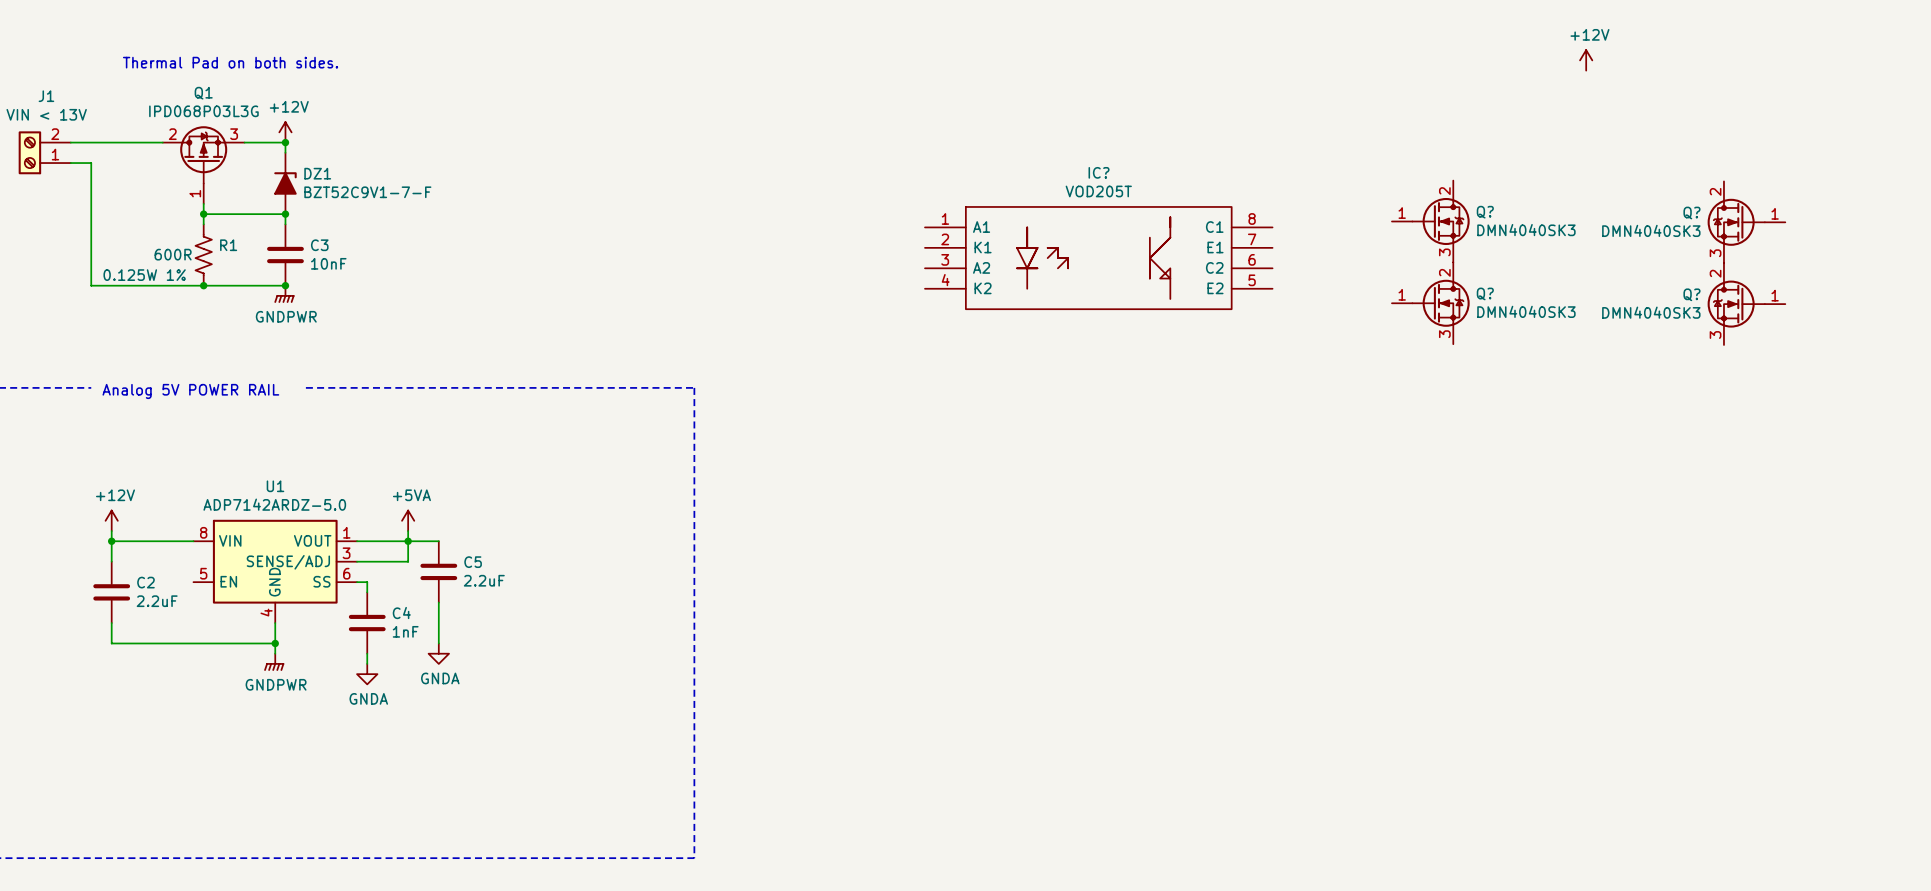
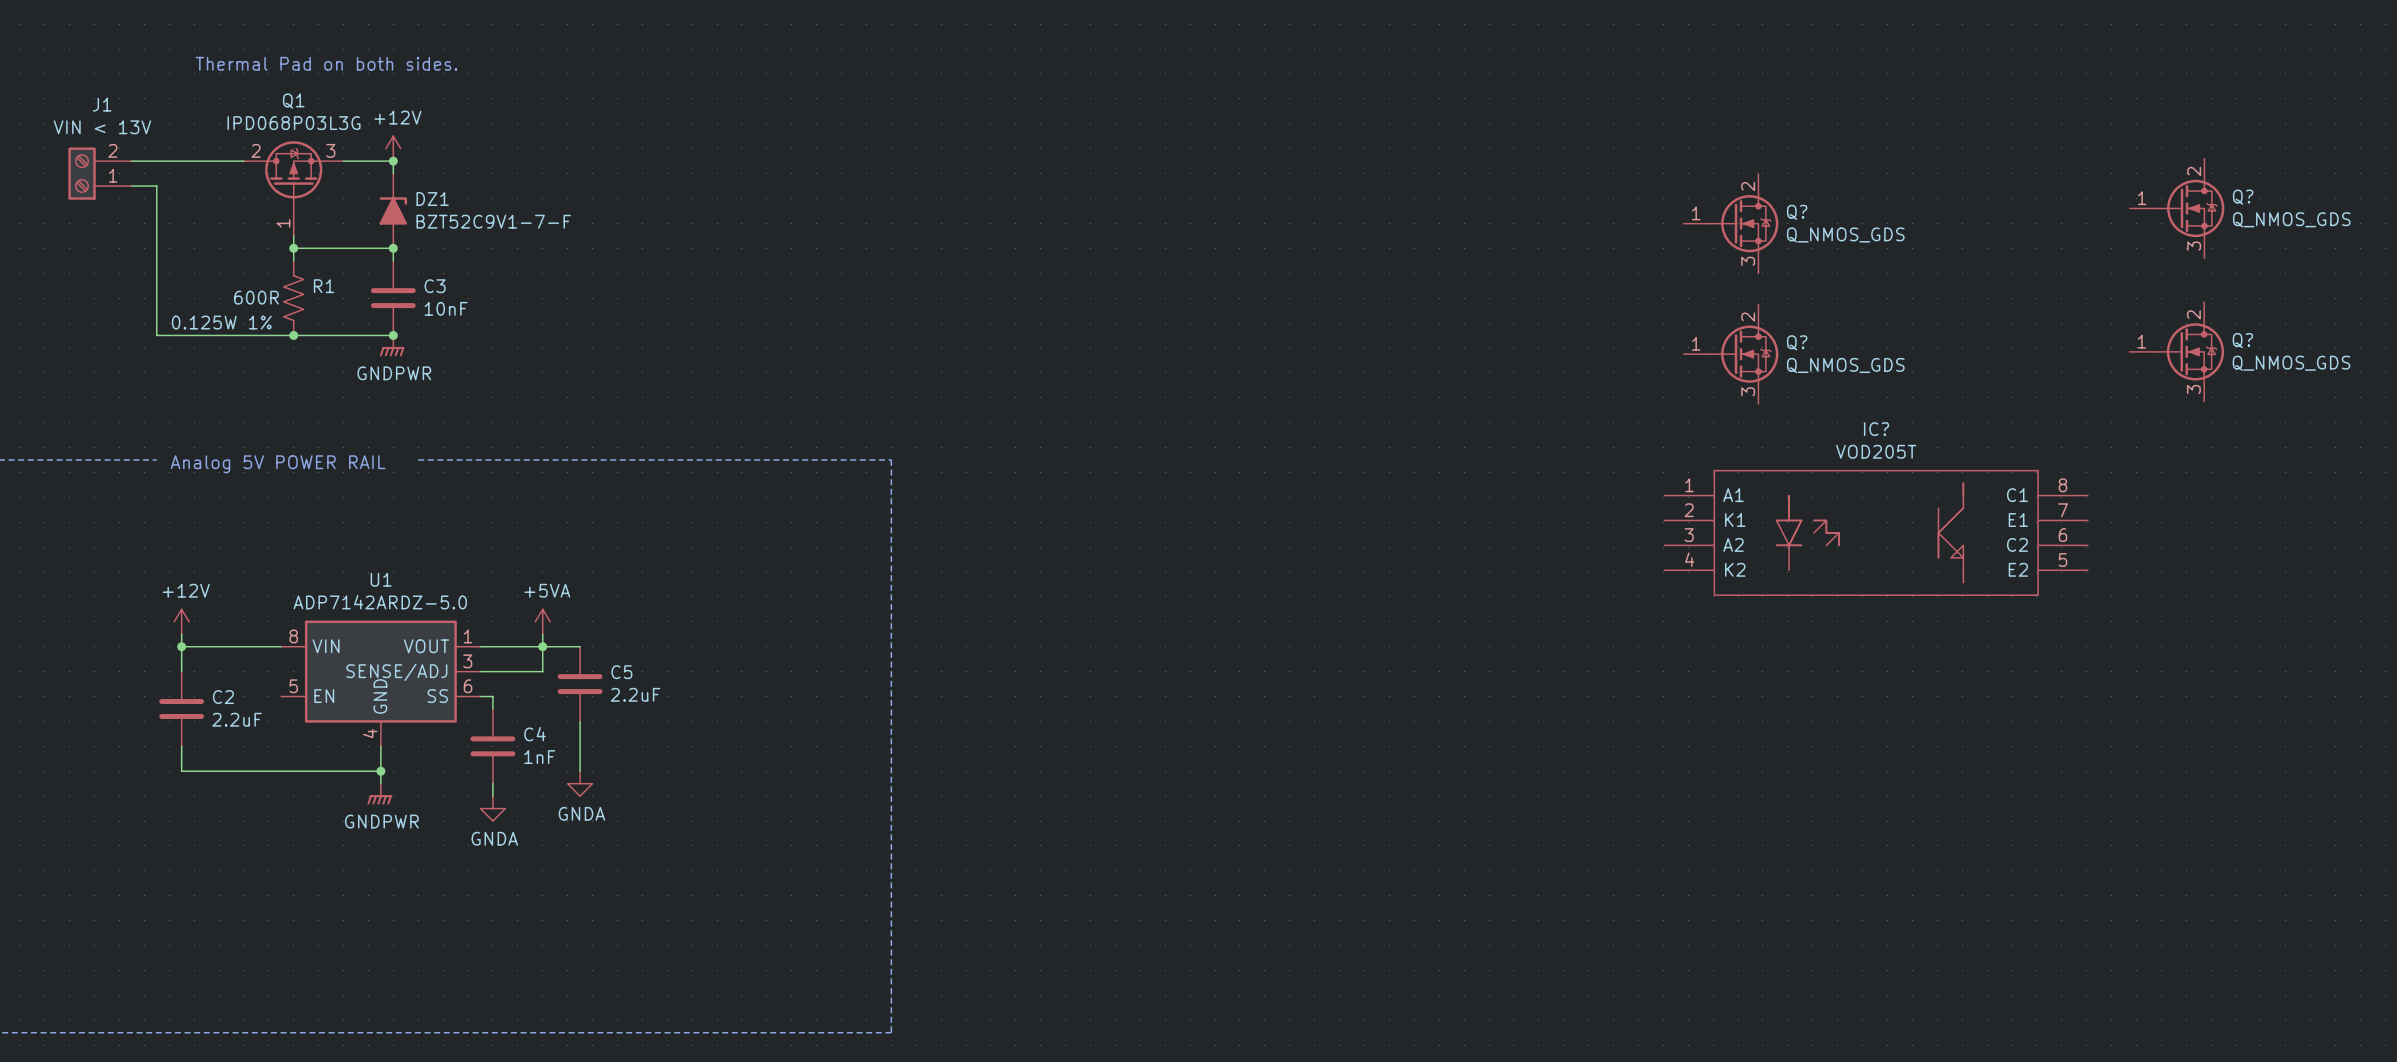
power symbol: +12V (1586, 60) -> none
Q?: none -> Q_NMOS_GDS (2177, 208)
Q?: none -> Q_NMOS_GDS (1731, 223)
Q?: DMN4040SK3 (1430, 221) -> none
Q?: DMN4040SK3 (1746, 222) -> none
IC?: VOD205T (1098, 258) -> none
Q?: none -> Q_NMOS_GDS (1731, 354)
Q?: DMN4040SK3 (1430, 303) -> none
Q? flip: as is (1736, 304) -> left-right (2189, 351)
Q? value: DMN4040SK3 (1651, 312) -> Q_NMOS_GDS (2291, 363)
IC?: none -> VOD205T (1876, 532)

